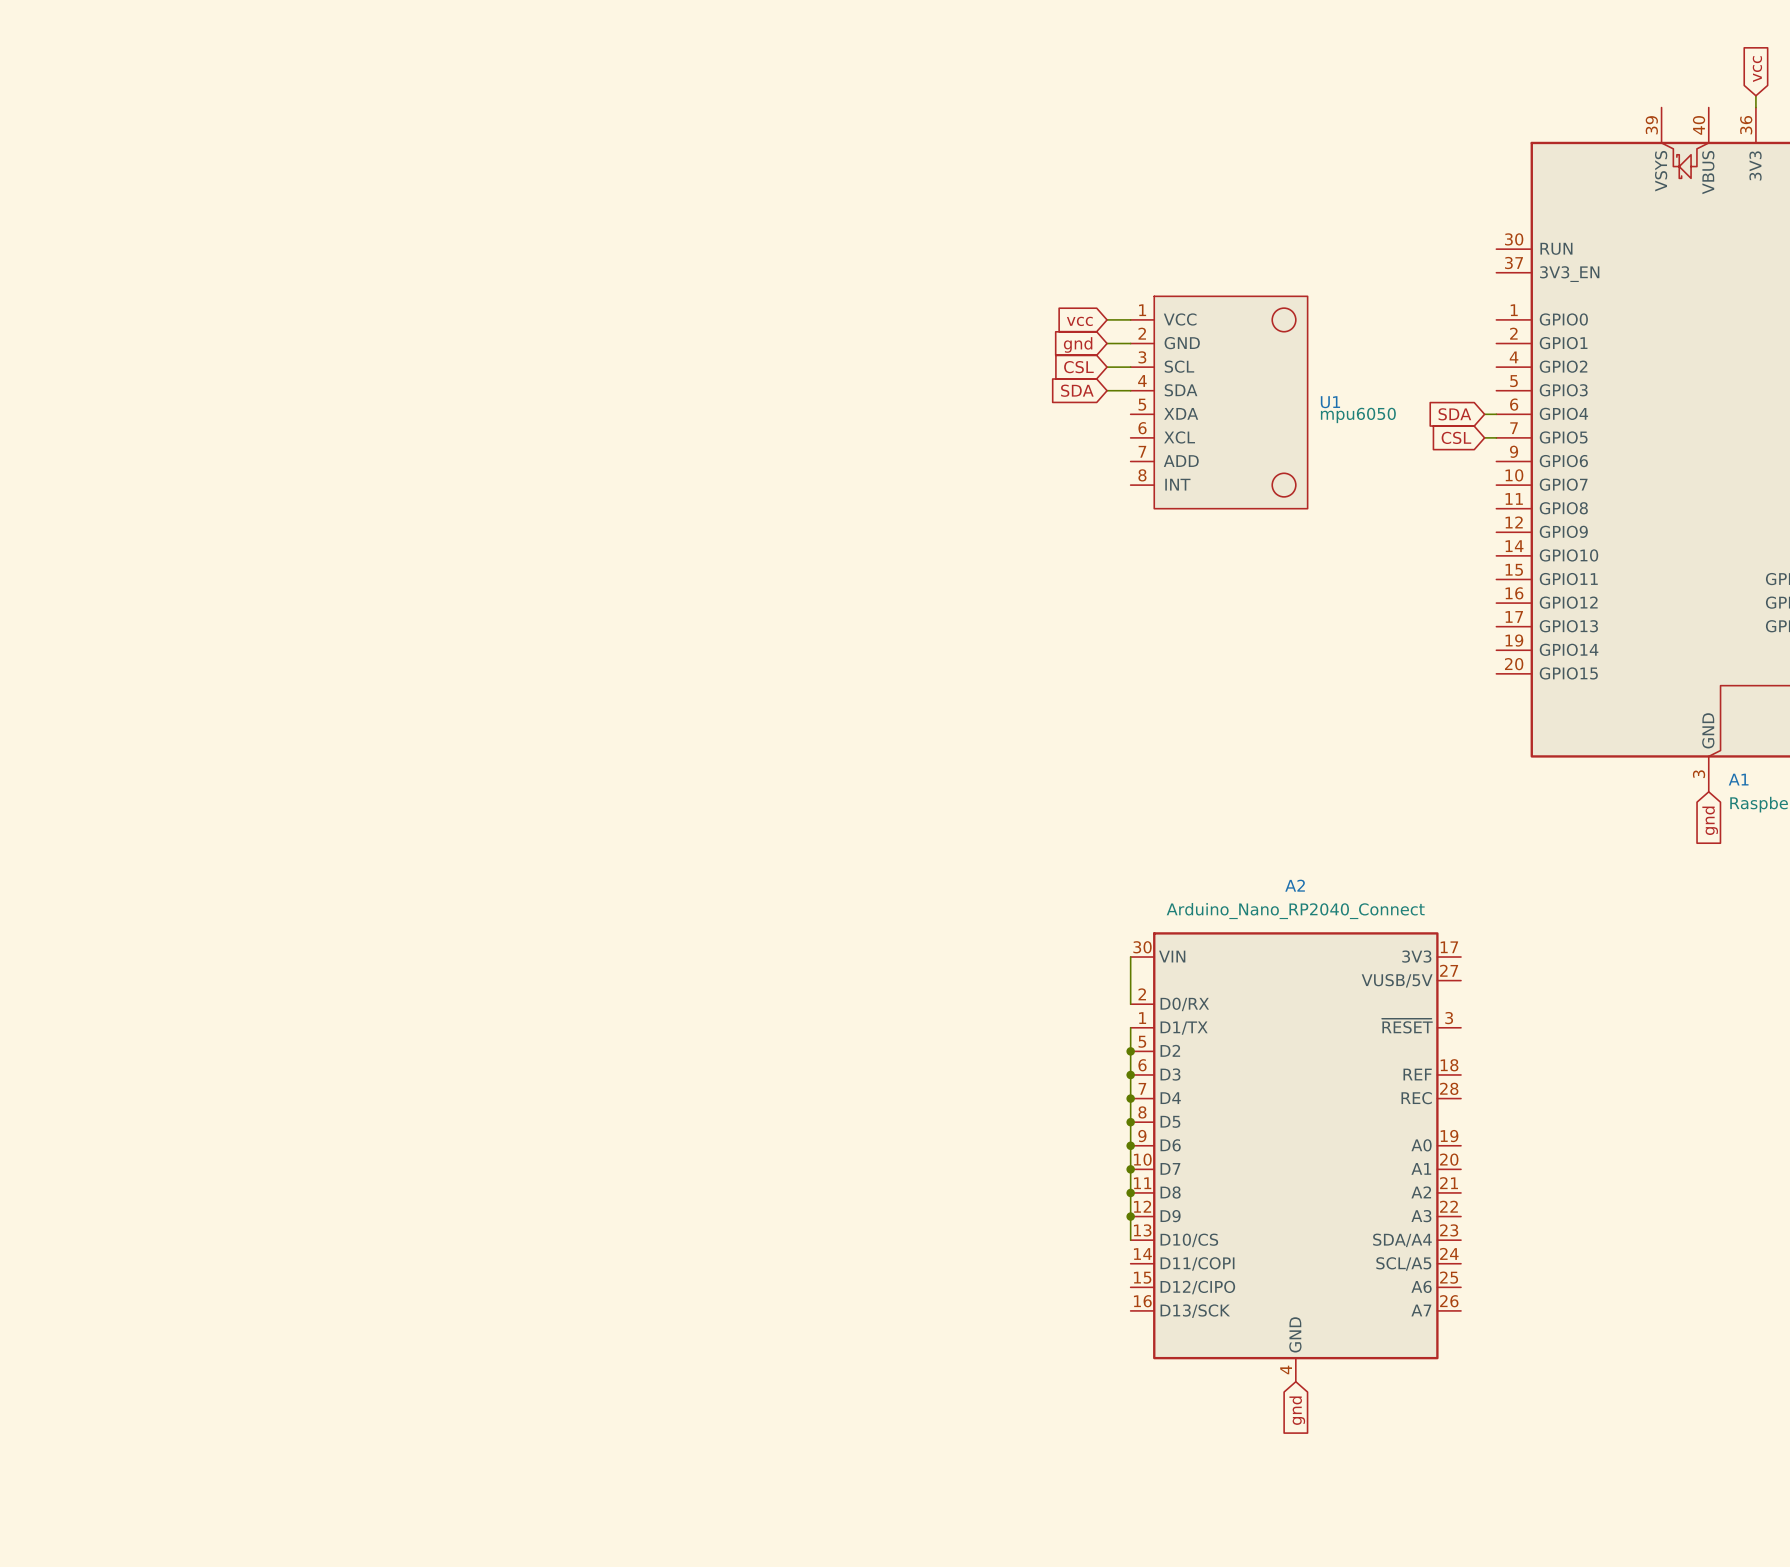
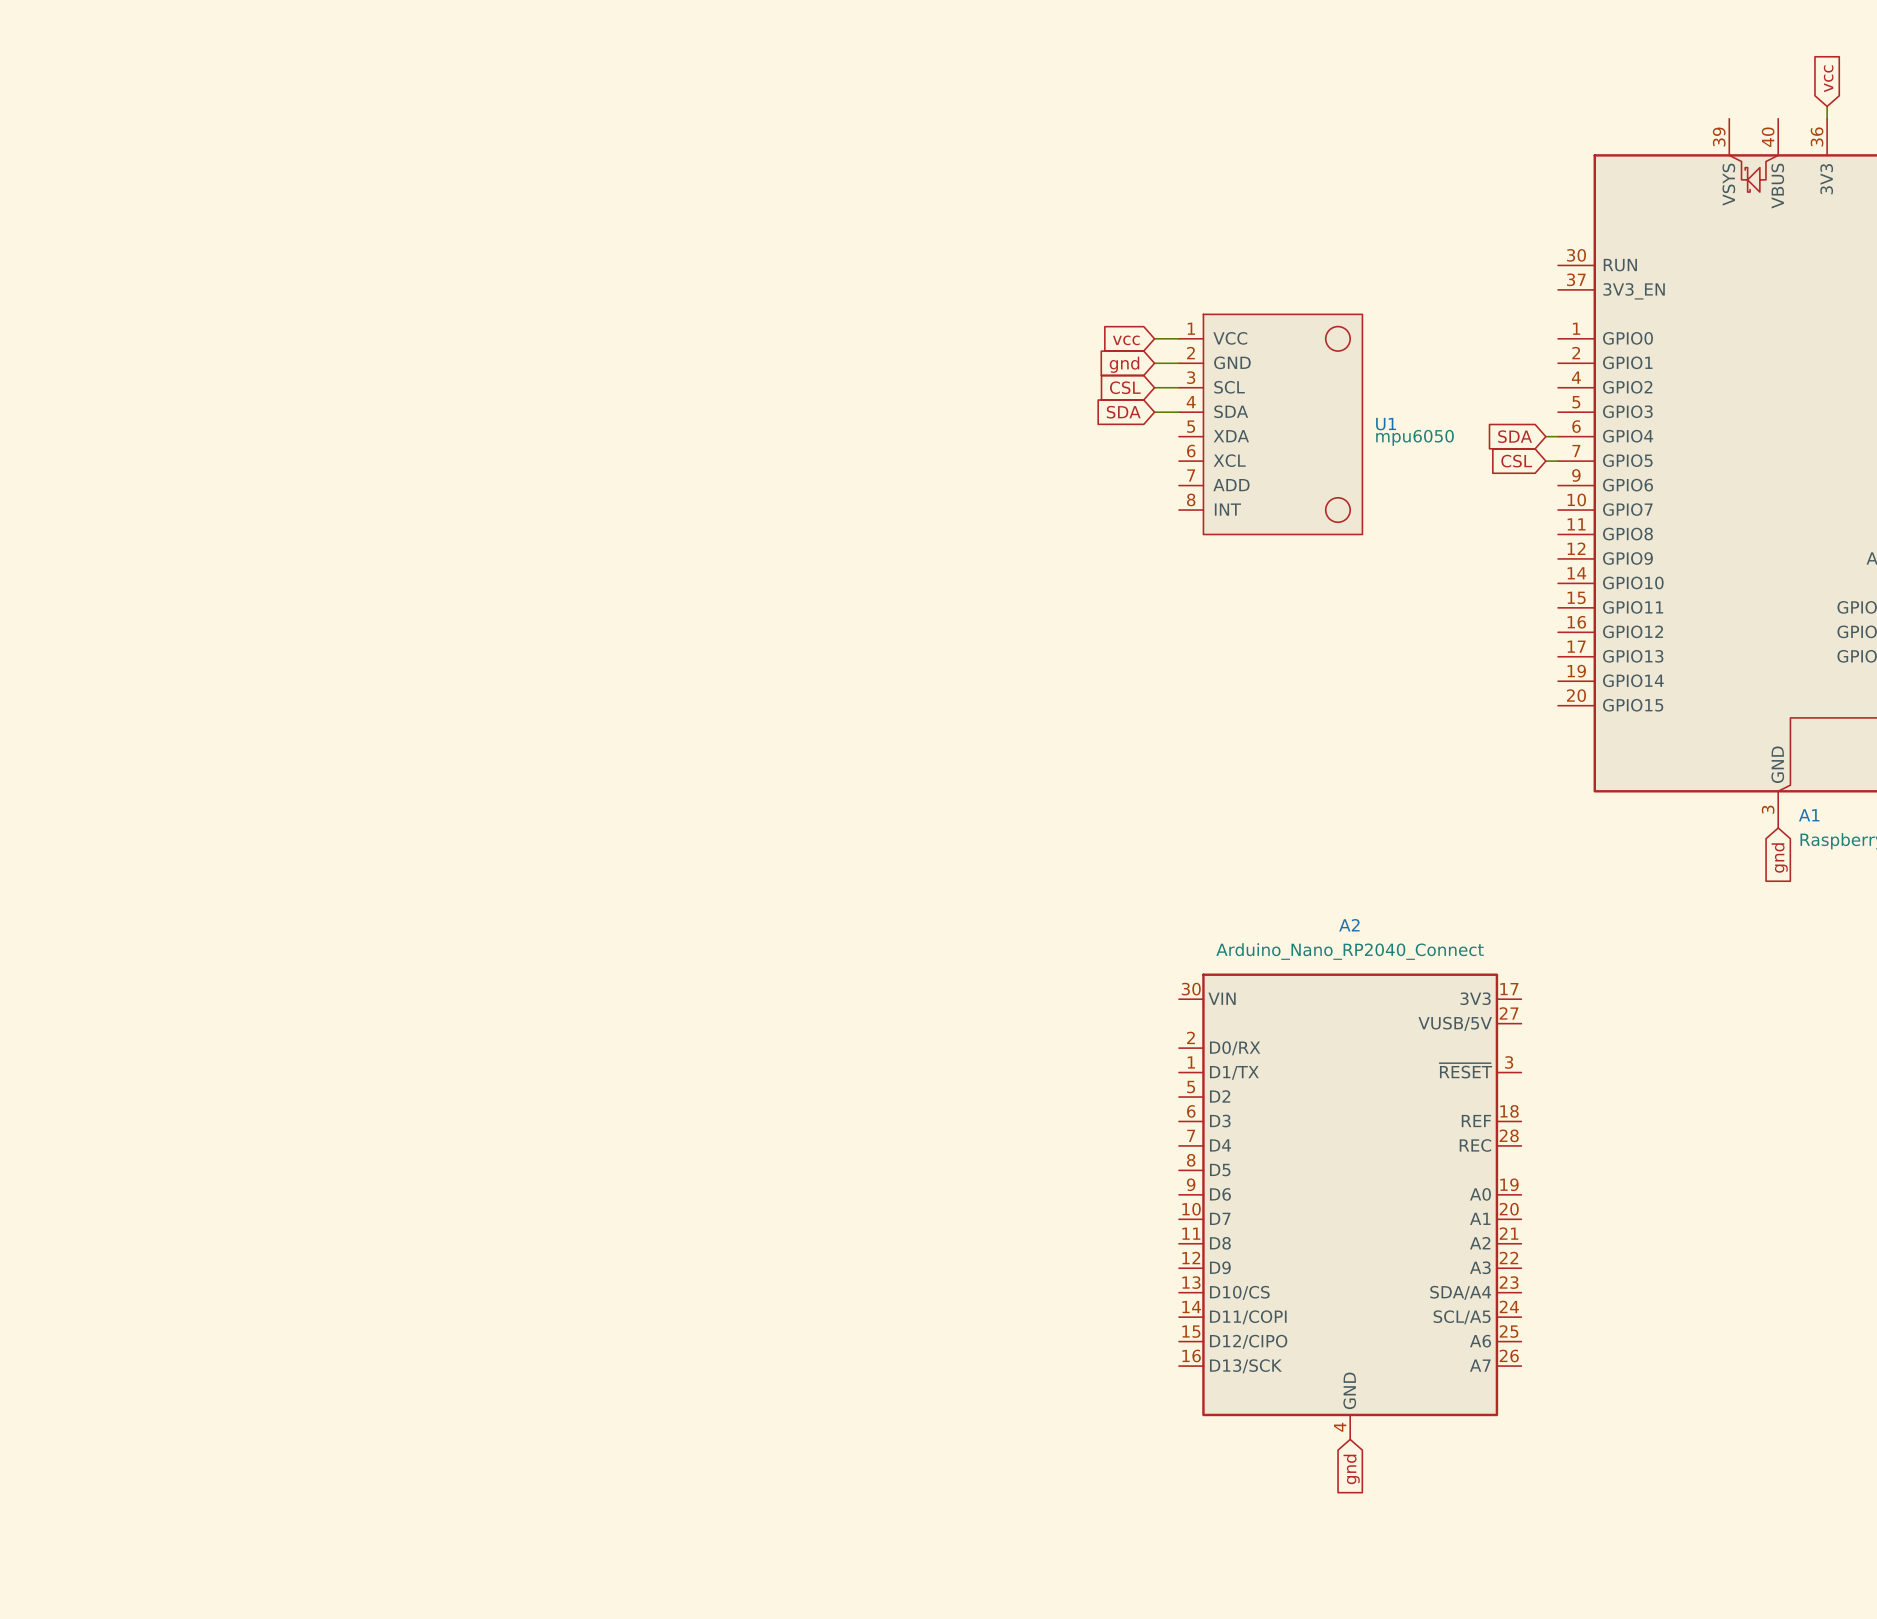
wire: (1130, 957) (1130, 1004) -> none
wire: (1130, 1027) (1130, 1240) -> none
junction: (1130, 1051) -> none
junction: (1130, 1074) -> none
junction: (1130, 1098) -> none
junction: (1130, 1122) -> none
junction: (1130, 1145) -> none
junction: (1130, 1169) -> none
junction: (1130, 1192) -> none
junction: (1130, 1216) -> none

